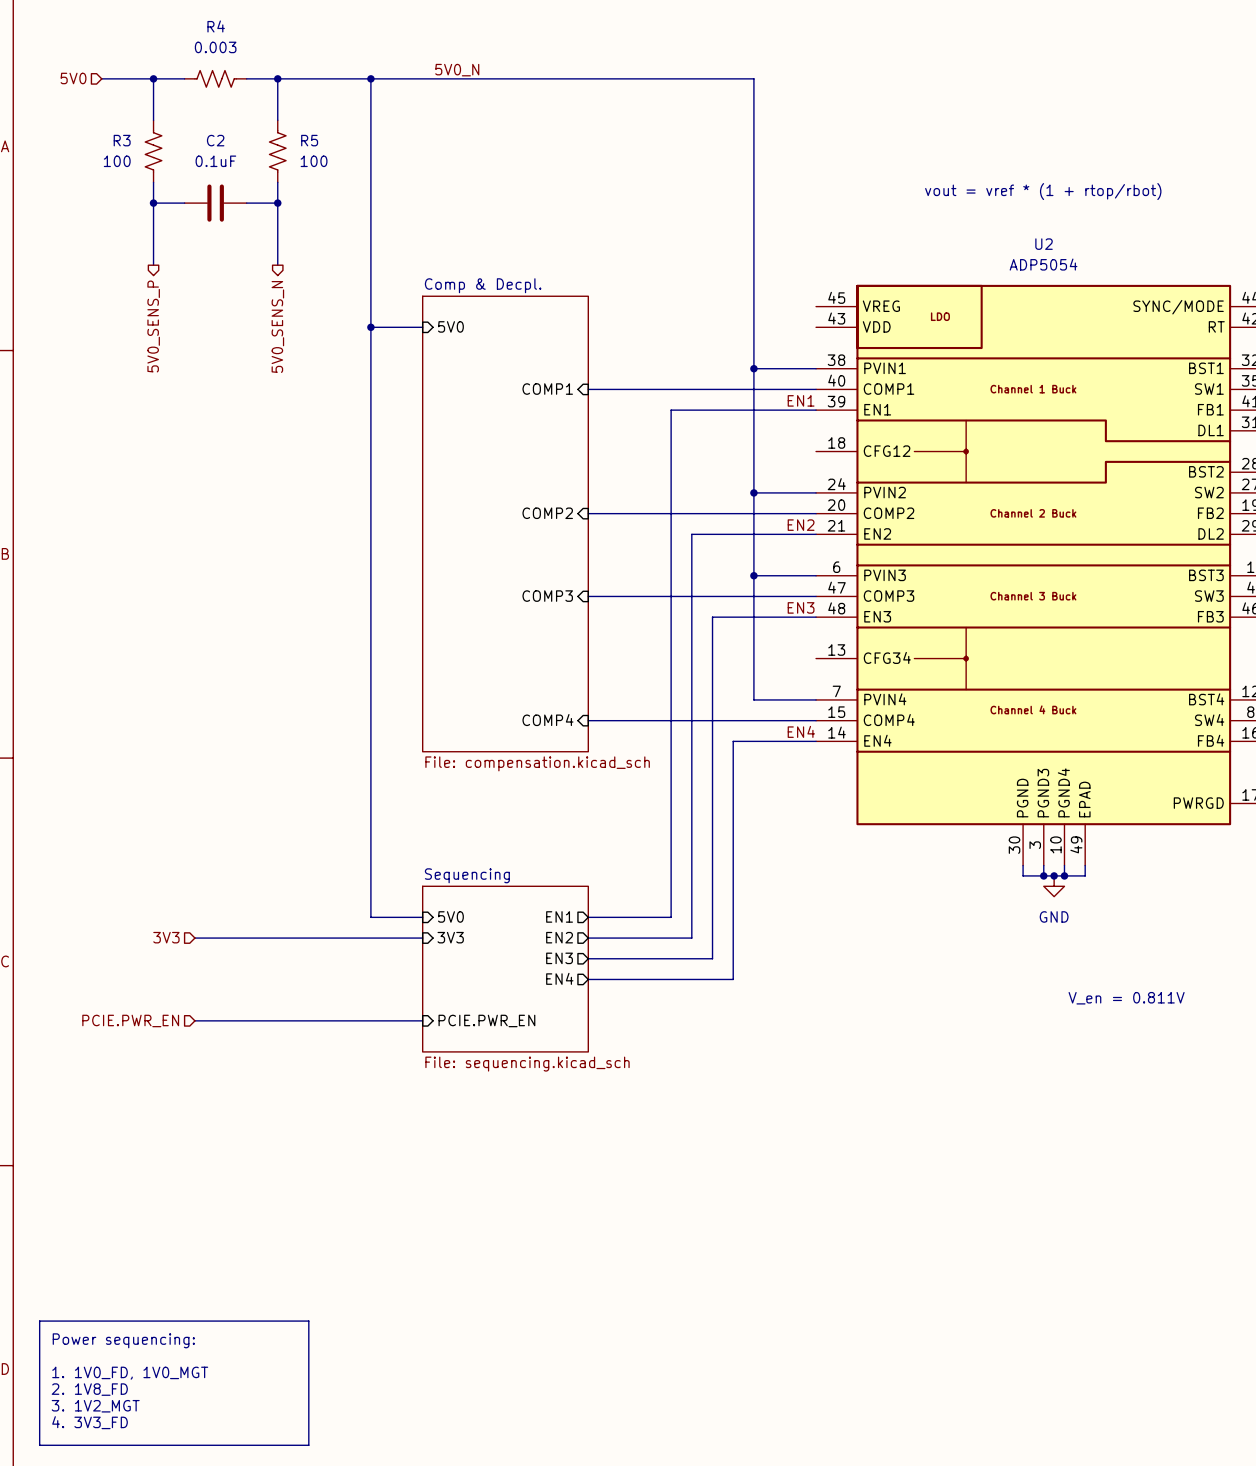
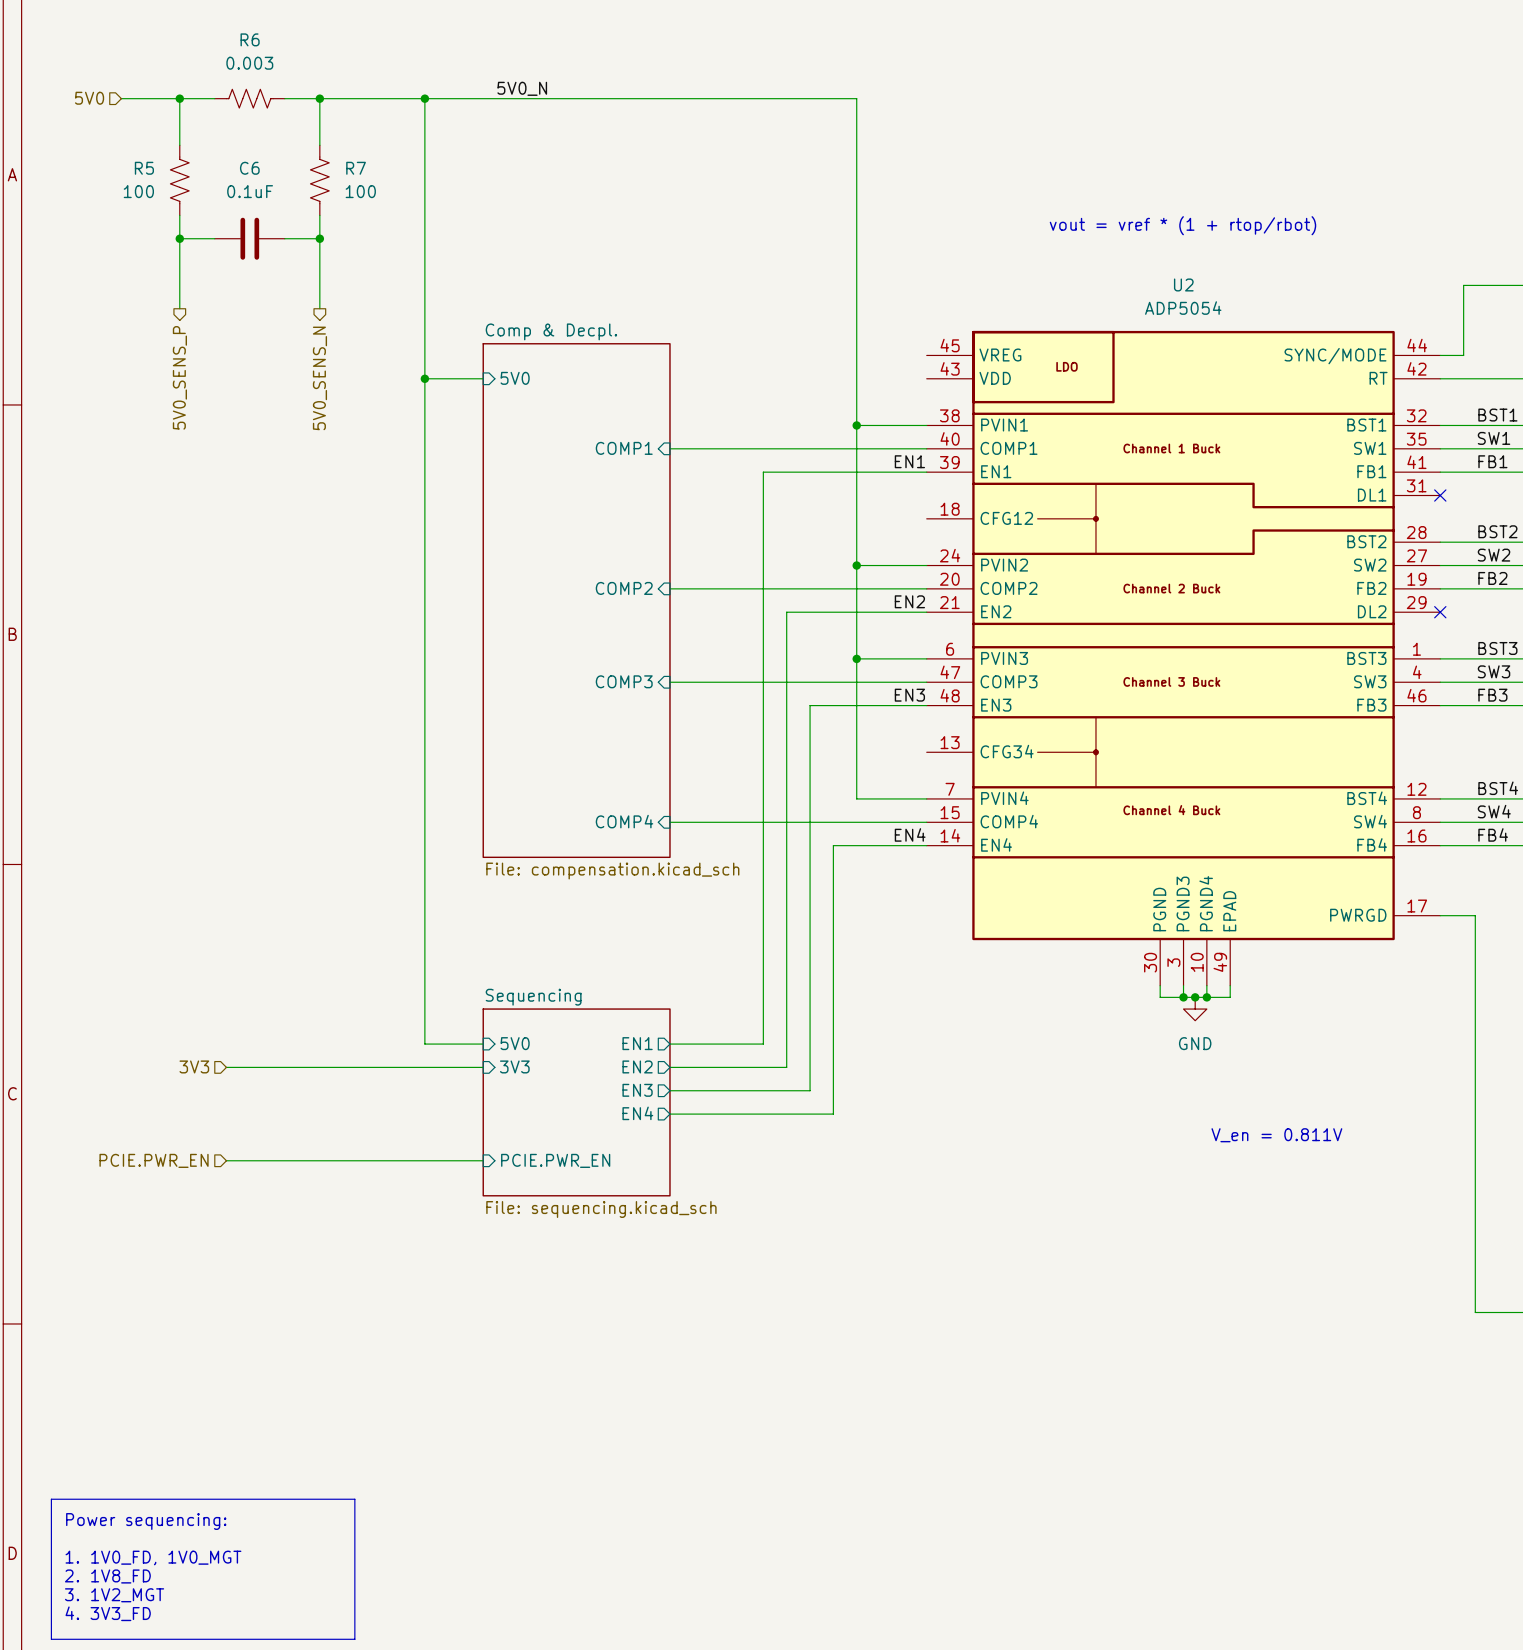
R4 name: R4 (216, 26) -> R6 (250, 39)
R3 name: R3 (122, 140) -> R5 (144, 168)
C2 name: C2 (215, 140) -> C6 (249, 168)
R5 name: R5 (309, 140) -> R7 (356, 168)

